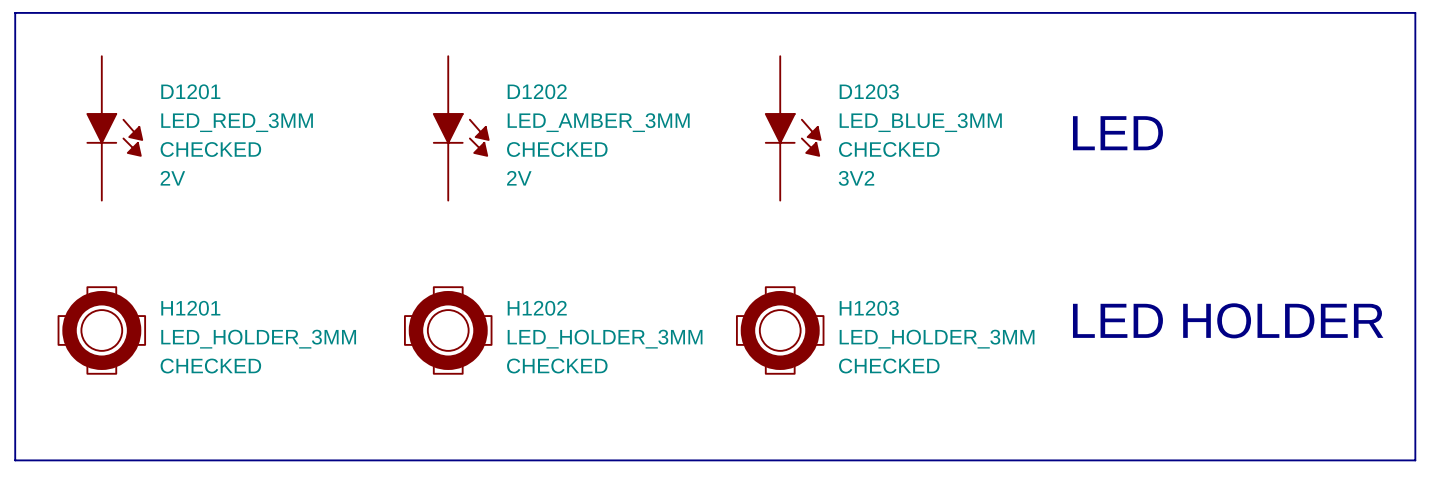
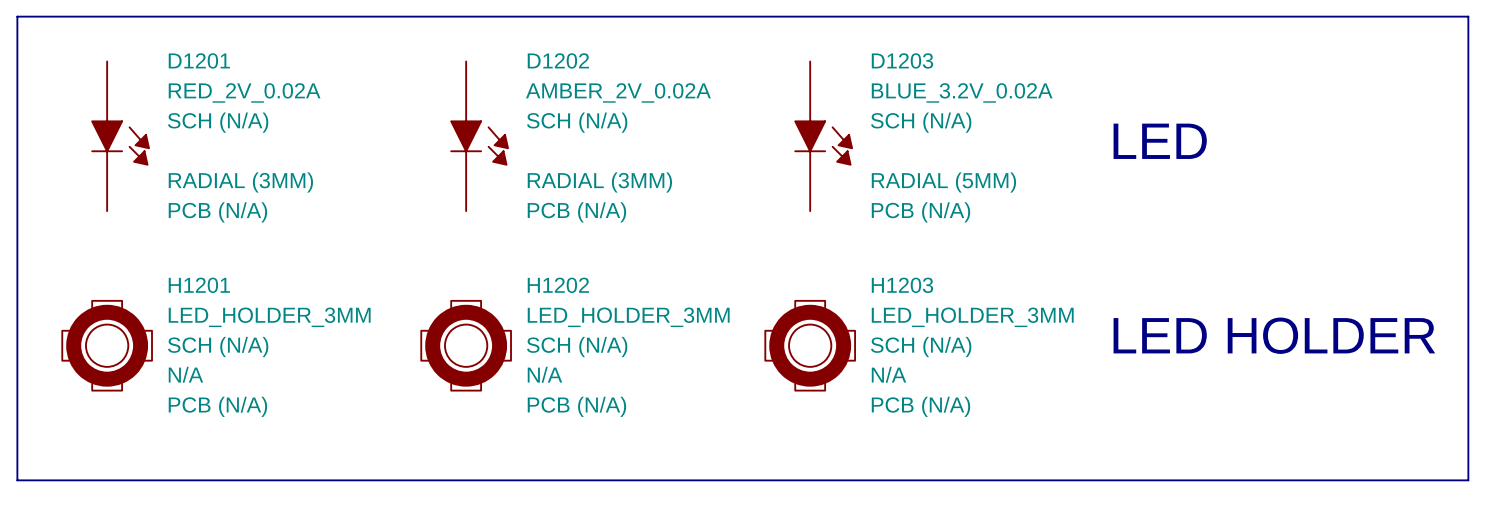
D1201 name position: D1201 (190, 91) -> D1201 (199, 60)
D1202 name position: D1202 (537, 91) -> D1202 (558, 60)
D1203 name position: D1203 (869, 91) -> D1203 (902, 60)
D1201 value: LED_RED_3MM (237, 122) -> RED_2V_0.02A (244, 92)
D1202 value: LED_AMBER_3MM (598, 122) -> AMBER_2V_0.02A (618, 92)
D1203 value: LED_BLUE_3MM (920, 122) -> BLUE_3.2V_0.02A (962, 92)
D1201 text: CHECKED (210, 149) -> SCH (N/A) (218, 122)
D1202 text: CHECKED (557, 149) -> SCH (N/A) (577, 122)
D1203 text: CHECKED (889, 149) -> SCH (N/A) (921, 122)
D1201 text: none -> RADIAL (3MM) (240, 182)
D1202 text: none -> RADIAL (3MM) (599, 182)
D1203 text: none -> RADIAL (5MM) (943, 182)
D1201 text: 2V (172, 178) -> none
D1202 text: 2V (519, 178) -> none
D1203 text: 3V2 (856, 178) -> none
D1201 text: none -> PCB (N/A) (217, 212)
D1202 text: none -> PCB (N/A) (576, 212)
D1203 text: none -> PCB (N/A) (920, 212)
H1201 name position: H1201 (190, 308) -> H1201 (199, 285)
H1202 name position: H1202 (537, 308) -> H1202 (558, 285)
H1203 name position: H1203 (869, 308) -> H1203 (902, 285)
H1201 value position: LED_HOLDER_3MM (258, 339) -> LED_HOLDER_3MM (269, 317)
H1202 value position: LED_HOLDER_3MM (605, 339) -> LED_HOLDER_3MM (628, 317)
H1203 value position: LED_HOLDER_3MM (937, 339) -> LED_HOLDER_3MM (972, 317)
H1201 text: none -> N/A (185, 374)
H1202 text: none -> N/A (544, 374)
H1203 text: none -> N/A (889, 374)
H1201 text: CHECKED (210, 366) -> SCH (N/A) (218, 347)
H1202 text: CHECKED (557, 366) -> SCH (N/A) (577, 347)
H1203 text: CHECKED (889, 366) -> SCH (N/A) (921, 347)
H1201 text: none -> PCB (N/A) (217, 406)
H1202 text: none -> PCB (N/A) (576, 406)
H1203 text: none -> PCB (N/A) (920, 406)

